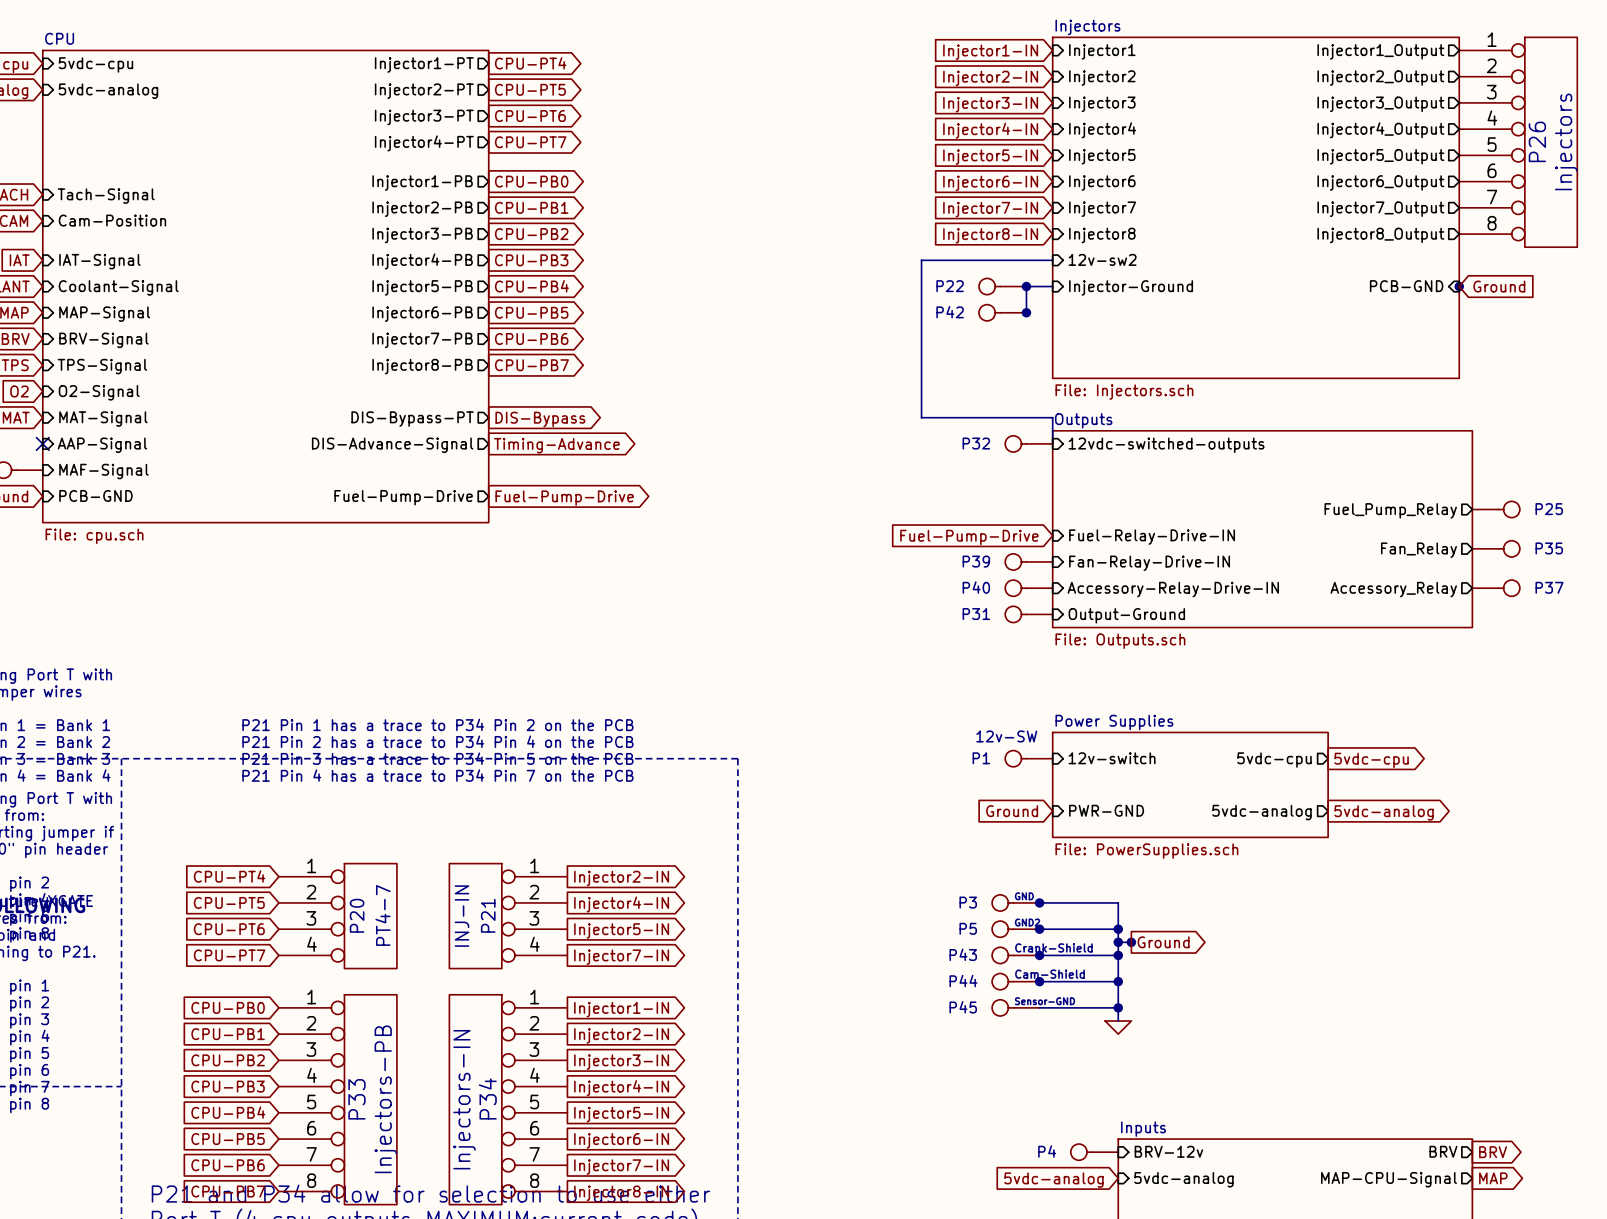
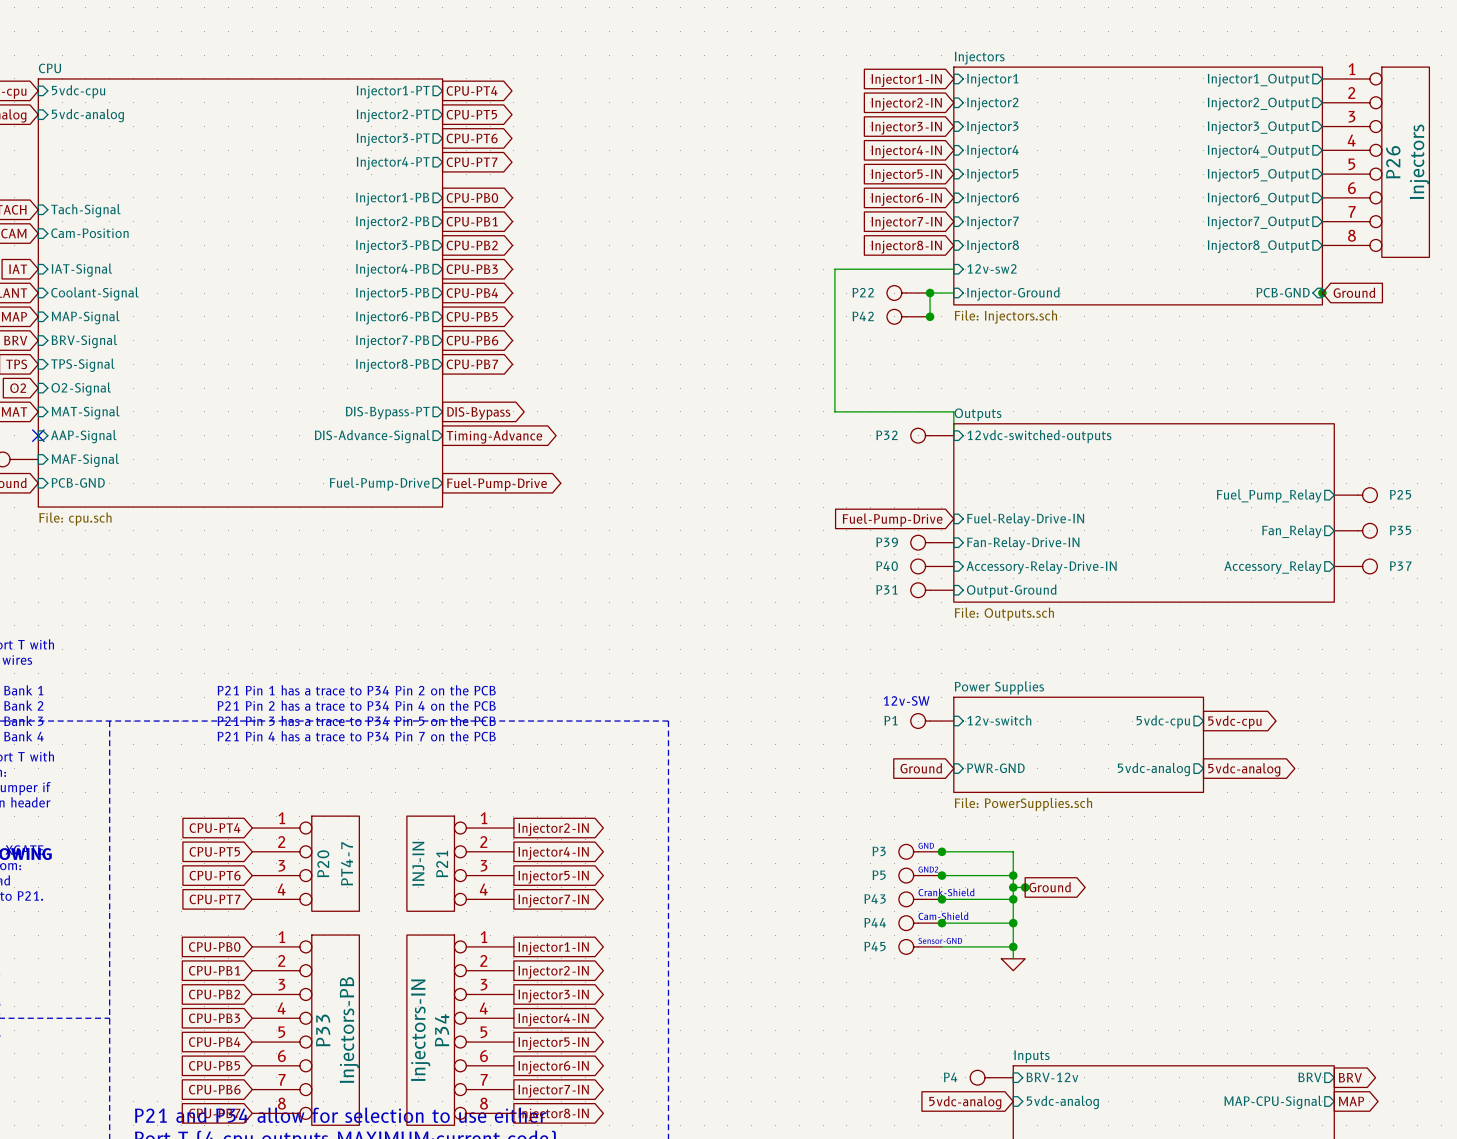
sheet Injectors: none -> File: Injectors.sch (1138, 185)
sheet Injectors: File: Injectors.sch (1255, 207) -> none

